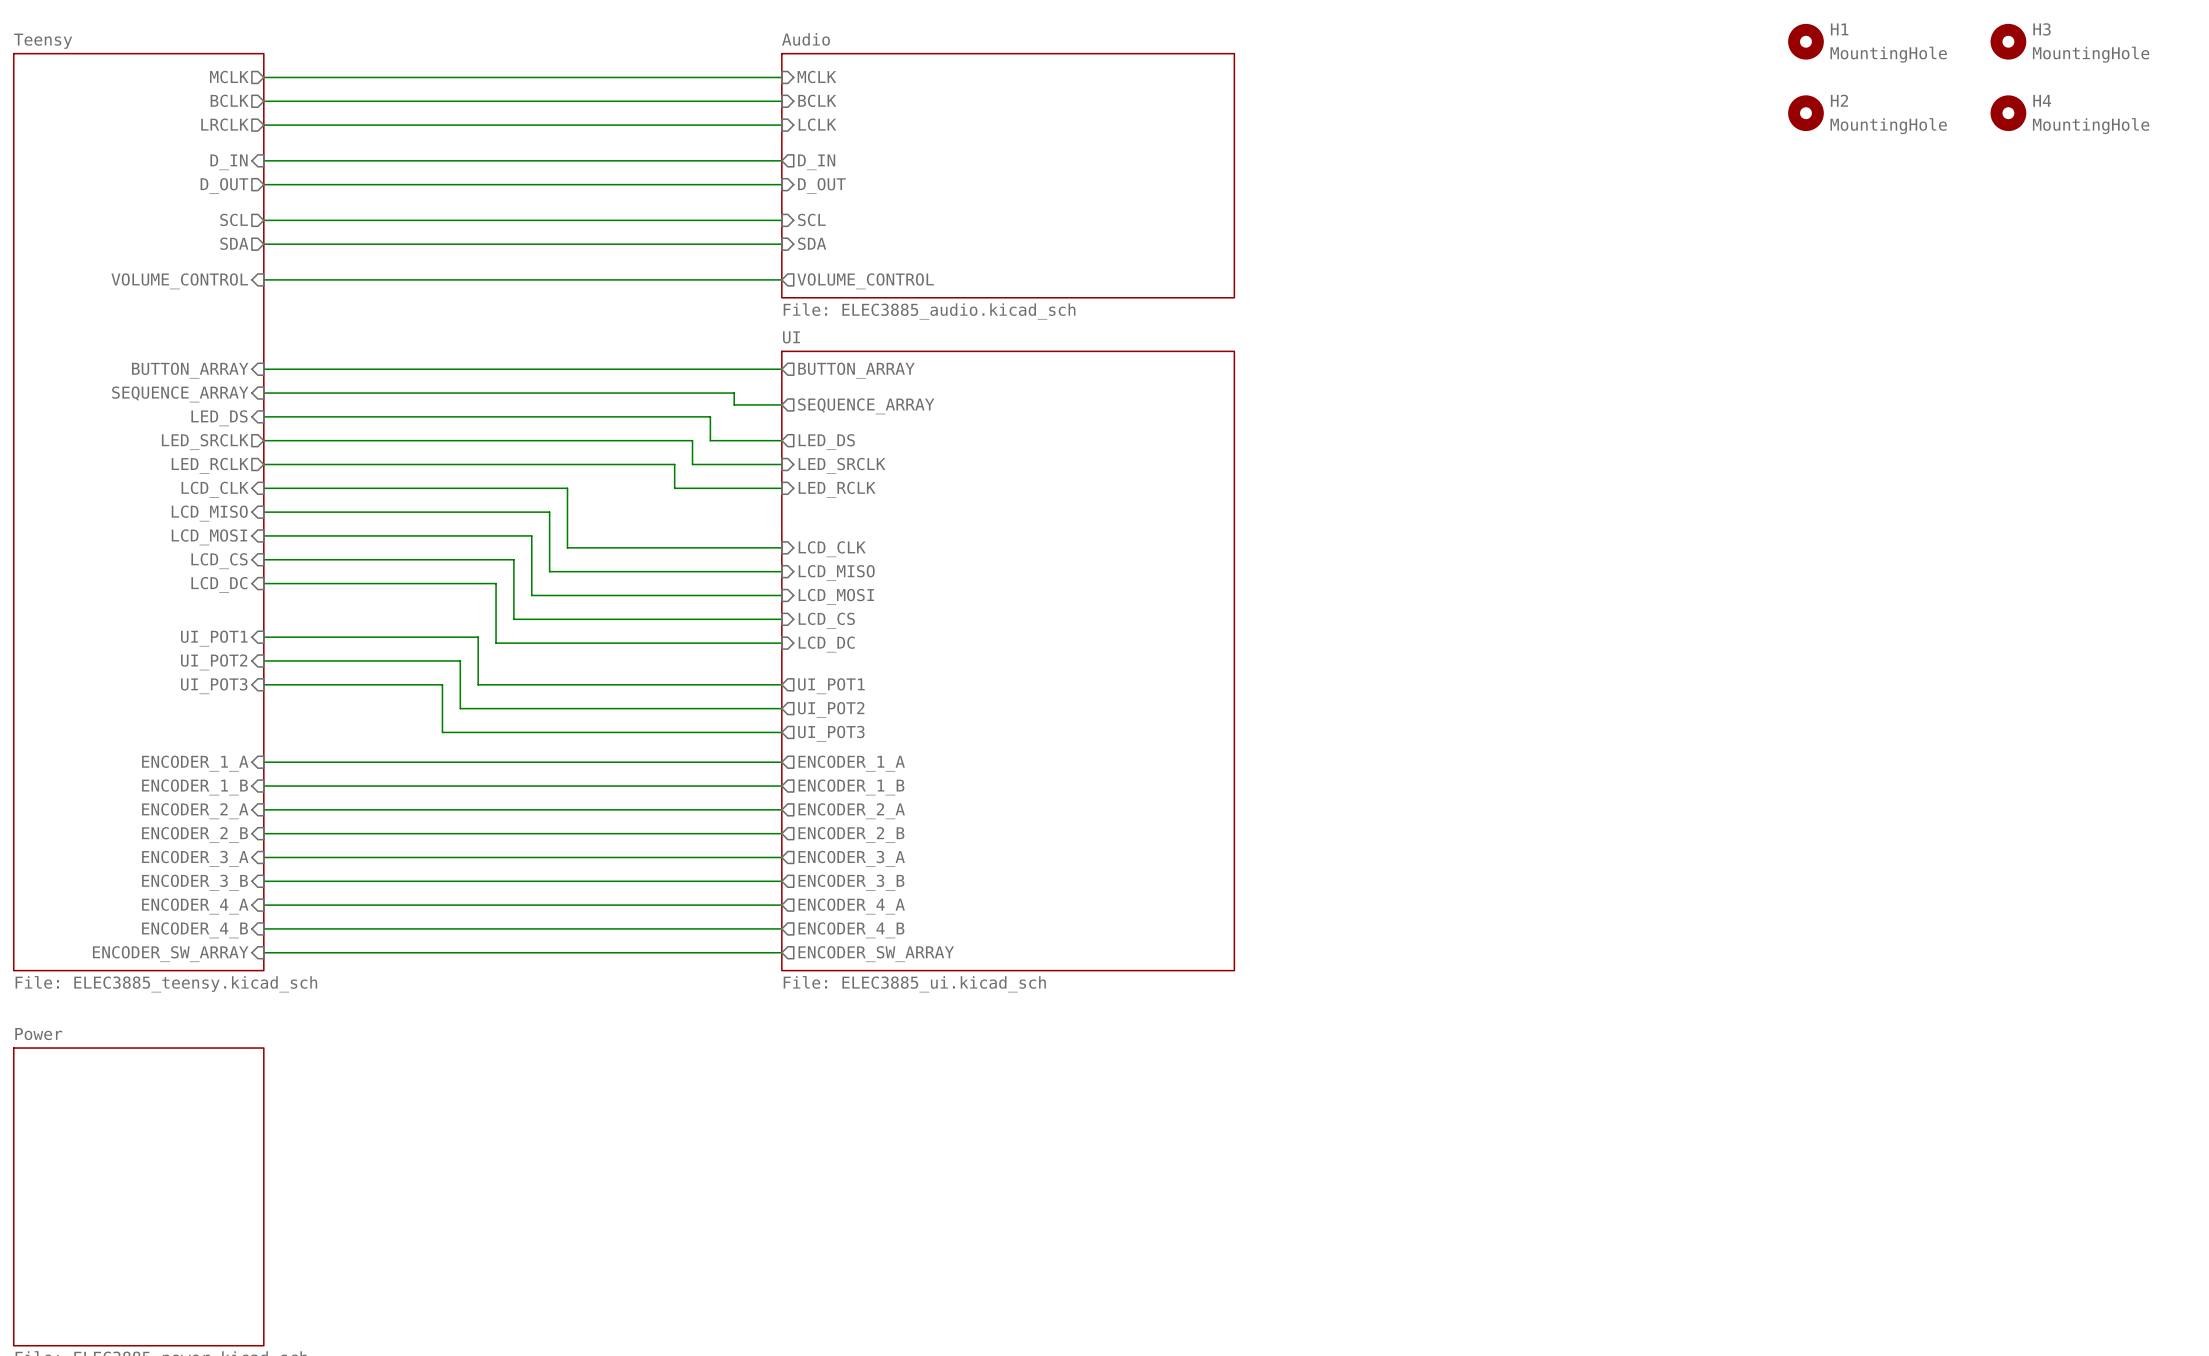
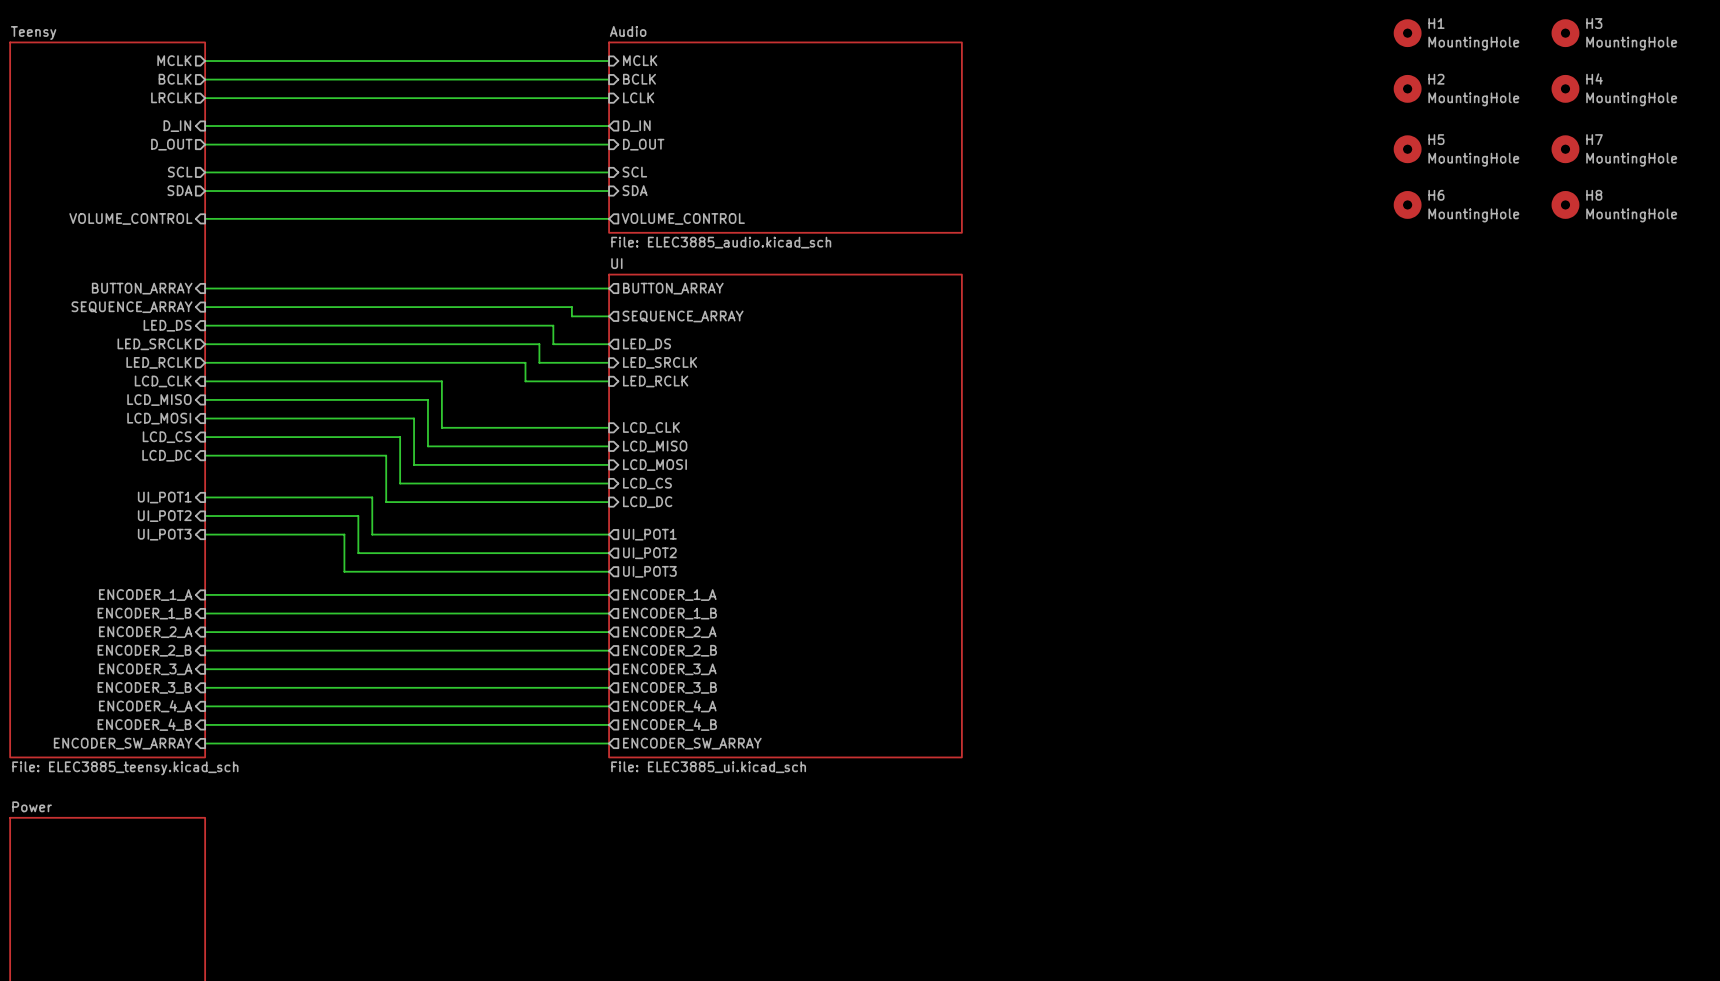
H5: none -> MountingHole (1407, 149)
H7: none -> MountingHole (1565, 149)
H6: none -> MountingHole (1407, 204)
H8: none -> MountingHole (1565, 204)

